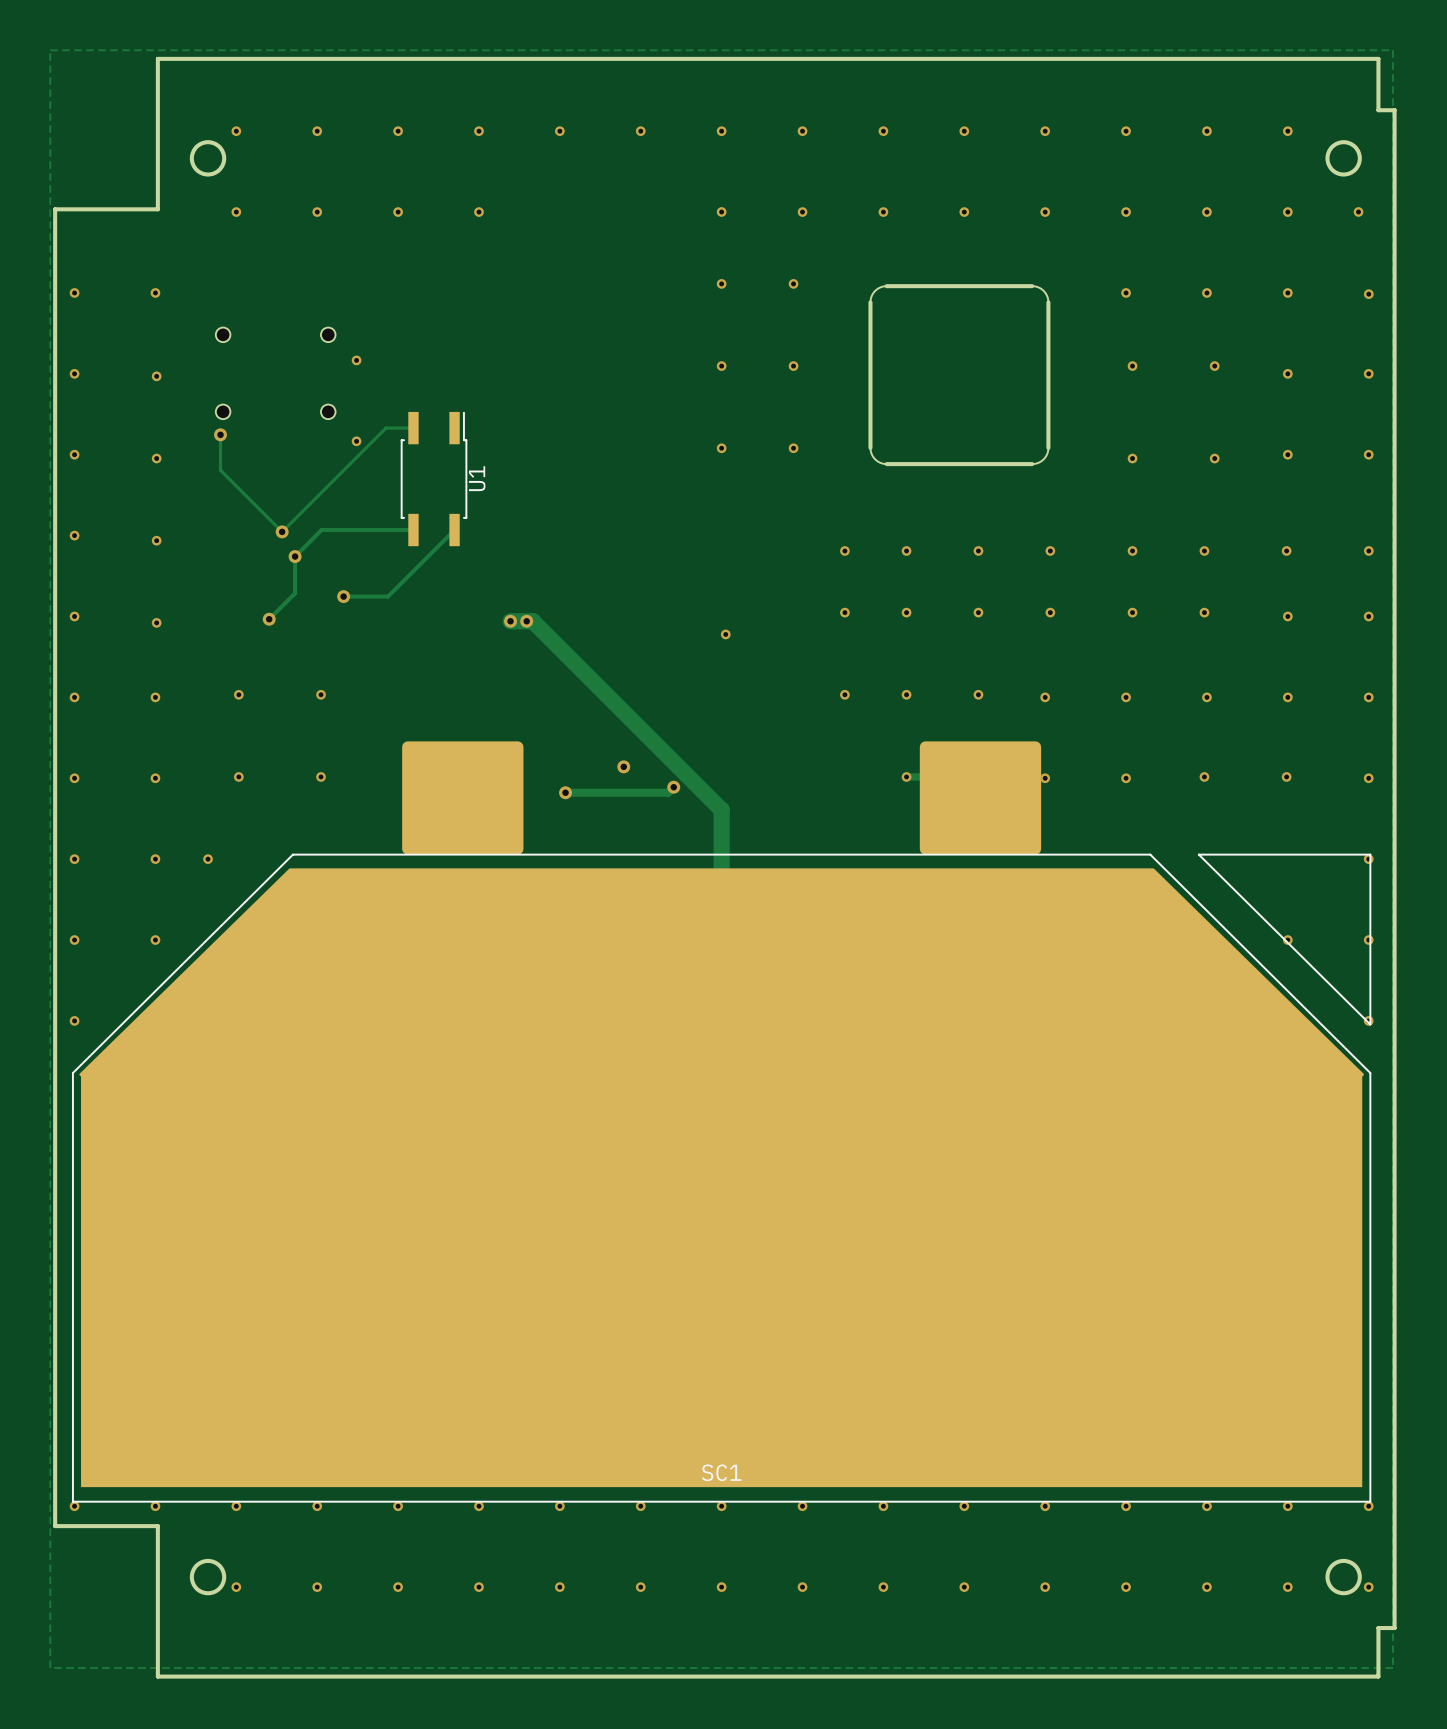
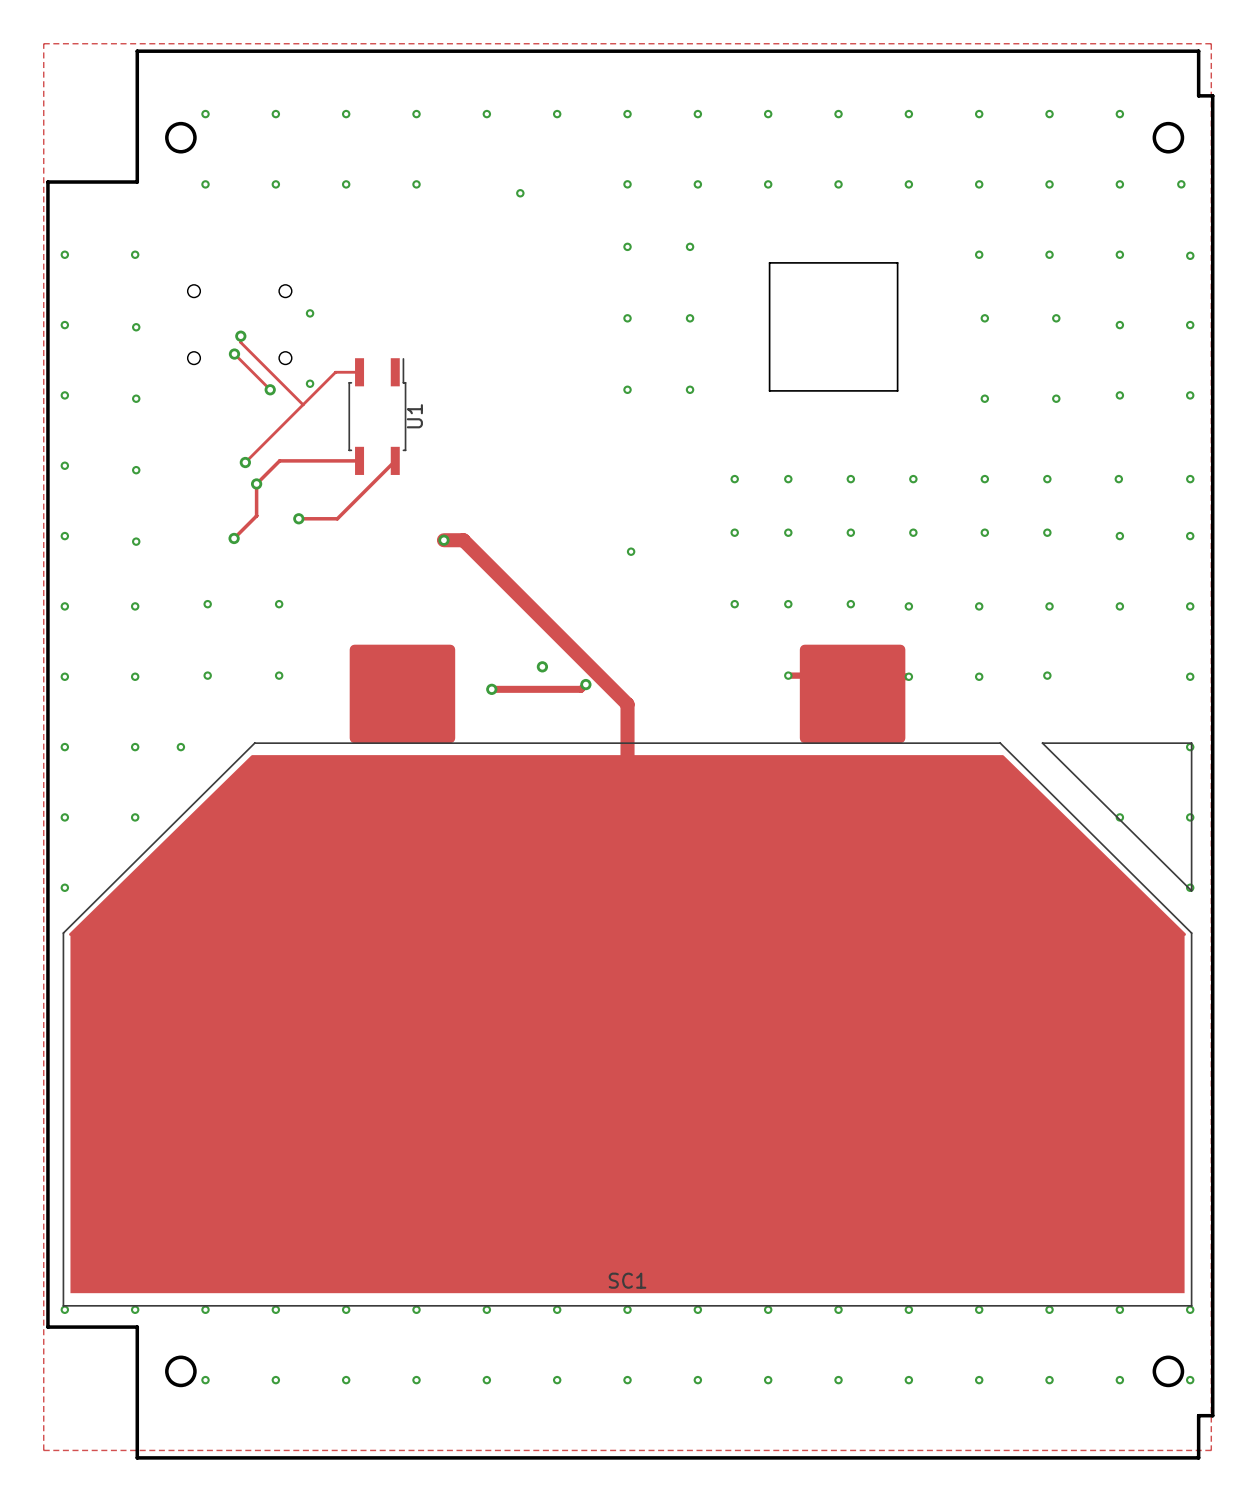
drawing shape: [53, 56, 1397, 1679] -> [46, 49, 1215, 1460]
via: none -> (520, 193)
track: none -> (240, 336) (240, 342) (303, 404)
via: none -> (240, 336)
track: none -> (234, 354) (270, 389)
via: none -> (234, 354)
track: (220, 434) (220, 470) (282, 531) -> none
via: (220, 434) -> none
via: none -> (270, 389)
via: (526, 621) -> none
via: (1286, 776) -> none

